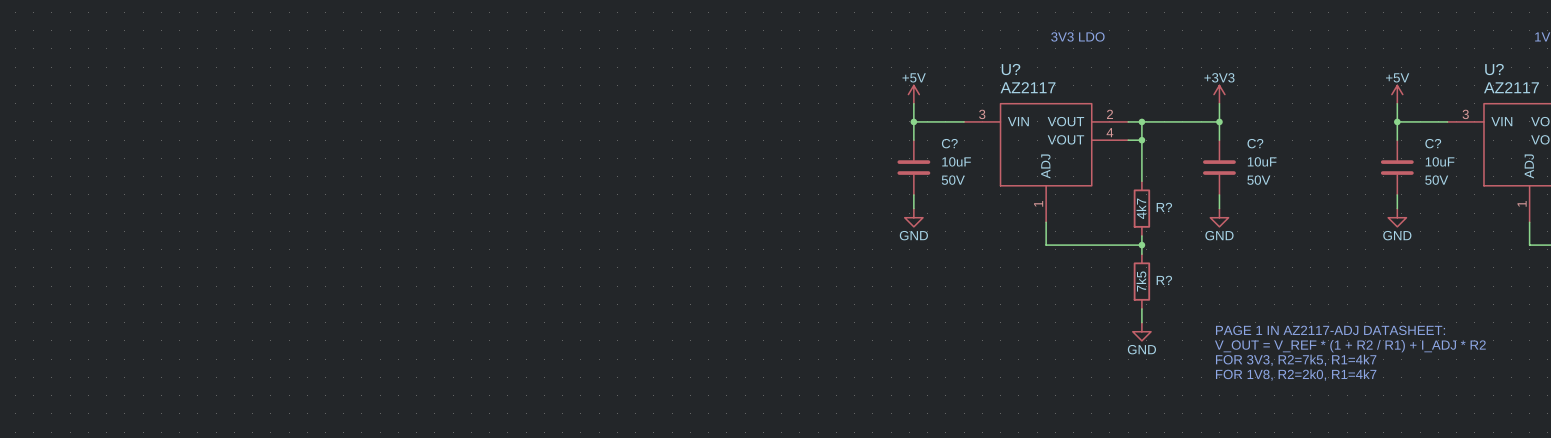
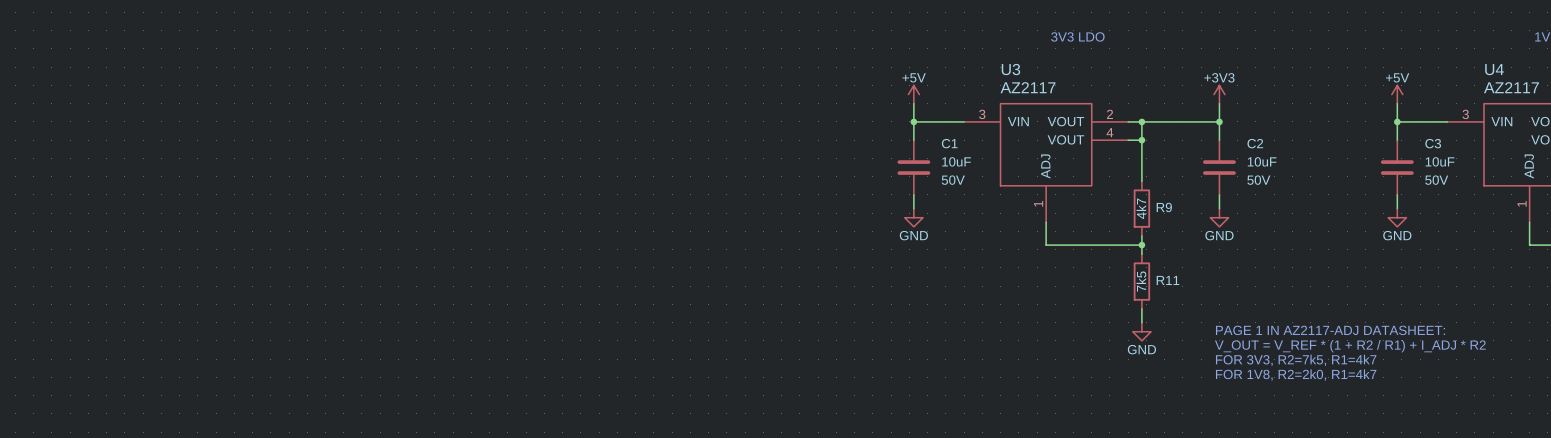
U? name: U? (1011, 69) -> U3 (1010, 69)
U? name: U? (1494, 69) -> U4 (1494, 69)
C? name: C? (949, 143) -> C1 (949, 143)
C? name: C? (1255, 143) -> C2 (1255, 143)
C? name: C? (1433, 143) -> C3 (1433, 143)
R? name: R? (1164, 207) -> R9 (1164, 207)
R? name: R? (1164, 280) -> R11 (1167, 280)

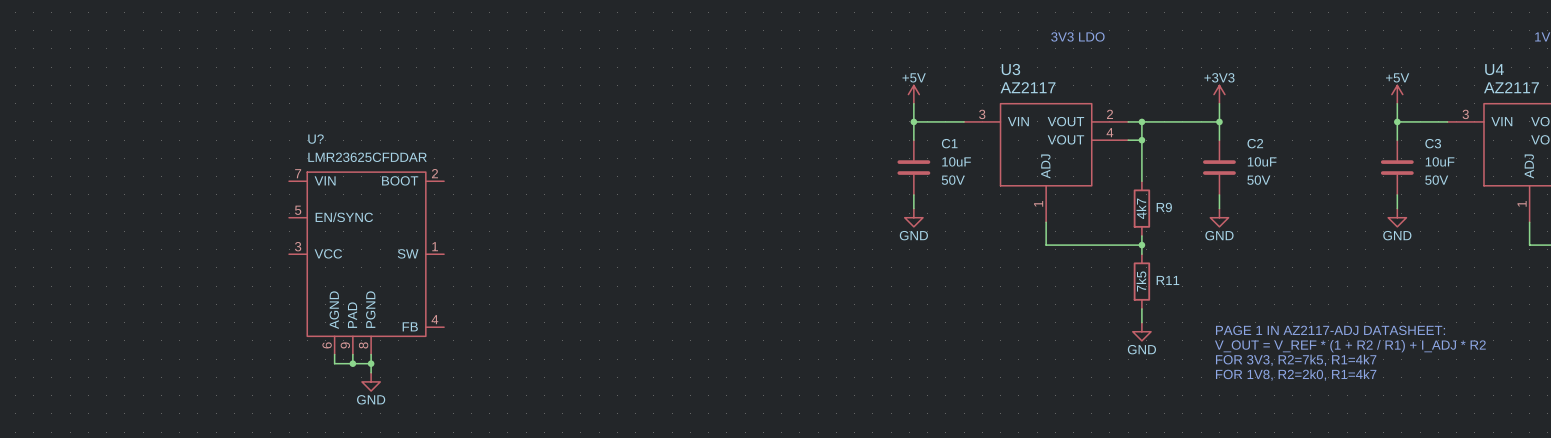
U?: none -> LMR23625CFDDAR (366, 263)
wire: none -> (334, 354) (334, 363) (371, 363)
wire: none -> (352, 354) (352, 363)
wire: none -> (371, 354) (371, 372)
junction: none -> (352, 363)
junction: none -> (371, 363)
power symbol: none -> GND (371, 381)

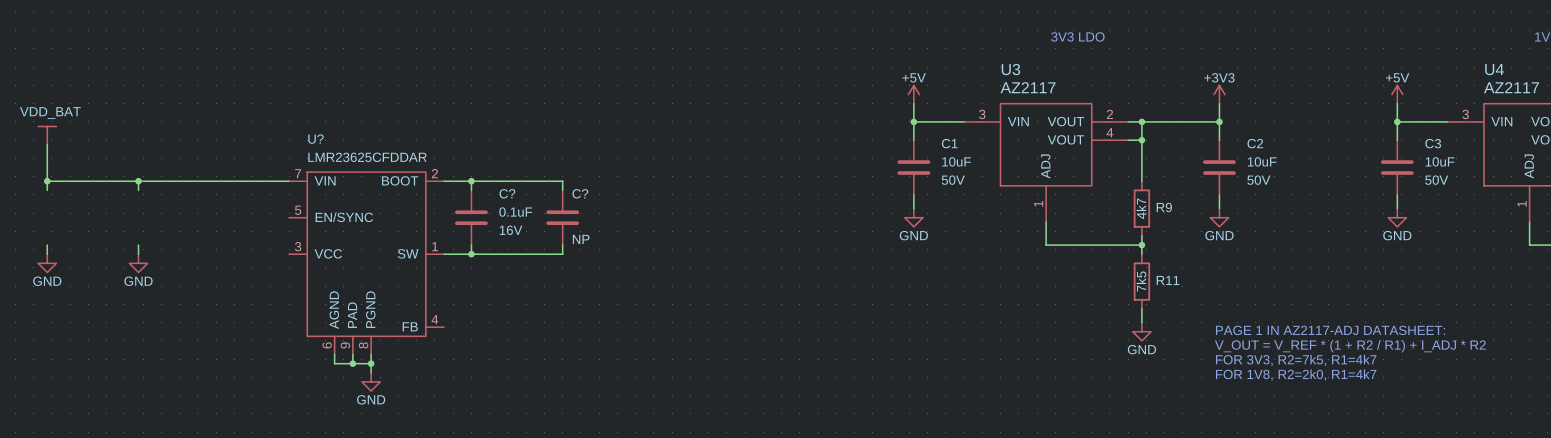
power symbol: none -> VDD_BAT (47, 135)
wire: none -> (47, 144) (47, 190)
wire: none -> (47, 181) (289, 181)
junction: none -> (47, 181)
wire: none -> (138, 181) (138, 190)
junction: none -> (138, 181)
wire: none -> (444, 181) (562, 181) (562, 190)
wire: none -> (471, 181) (471, 190)
junction: none -> (471, 181)
C?: none -> (471, 217)
C?: none -> (562, 217)
wire: none -> (47, 245) (47, 254)
wire: none -> (138, 245) (138, 254)
wire: none -> (471, 245) (471, 254)
wire: none -> (562, 245) (562, 254) (444, 254)
junction: none -> (471, 254)
power symbol: none -> GND (47, 263)
power symbol: none -> GND (138, 263)

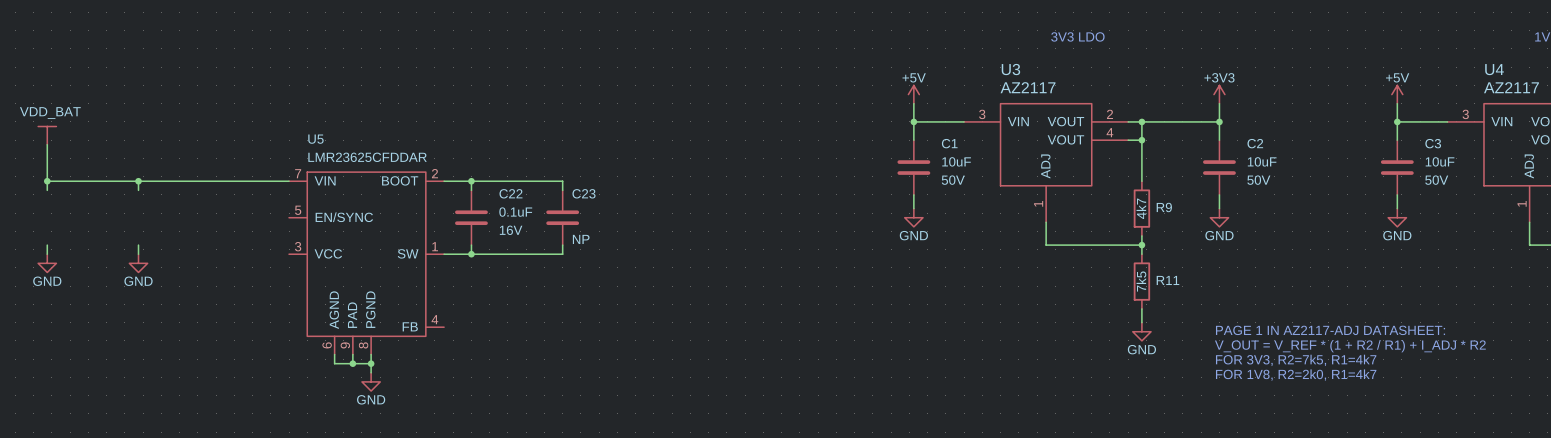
U? name: U? (316, 139) -> U5 (315, 139)
C? name: C? (507, 193) -> C22 (510, 193)
C? name: C? (580, 193) -> C23 (584, 193)

